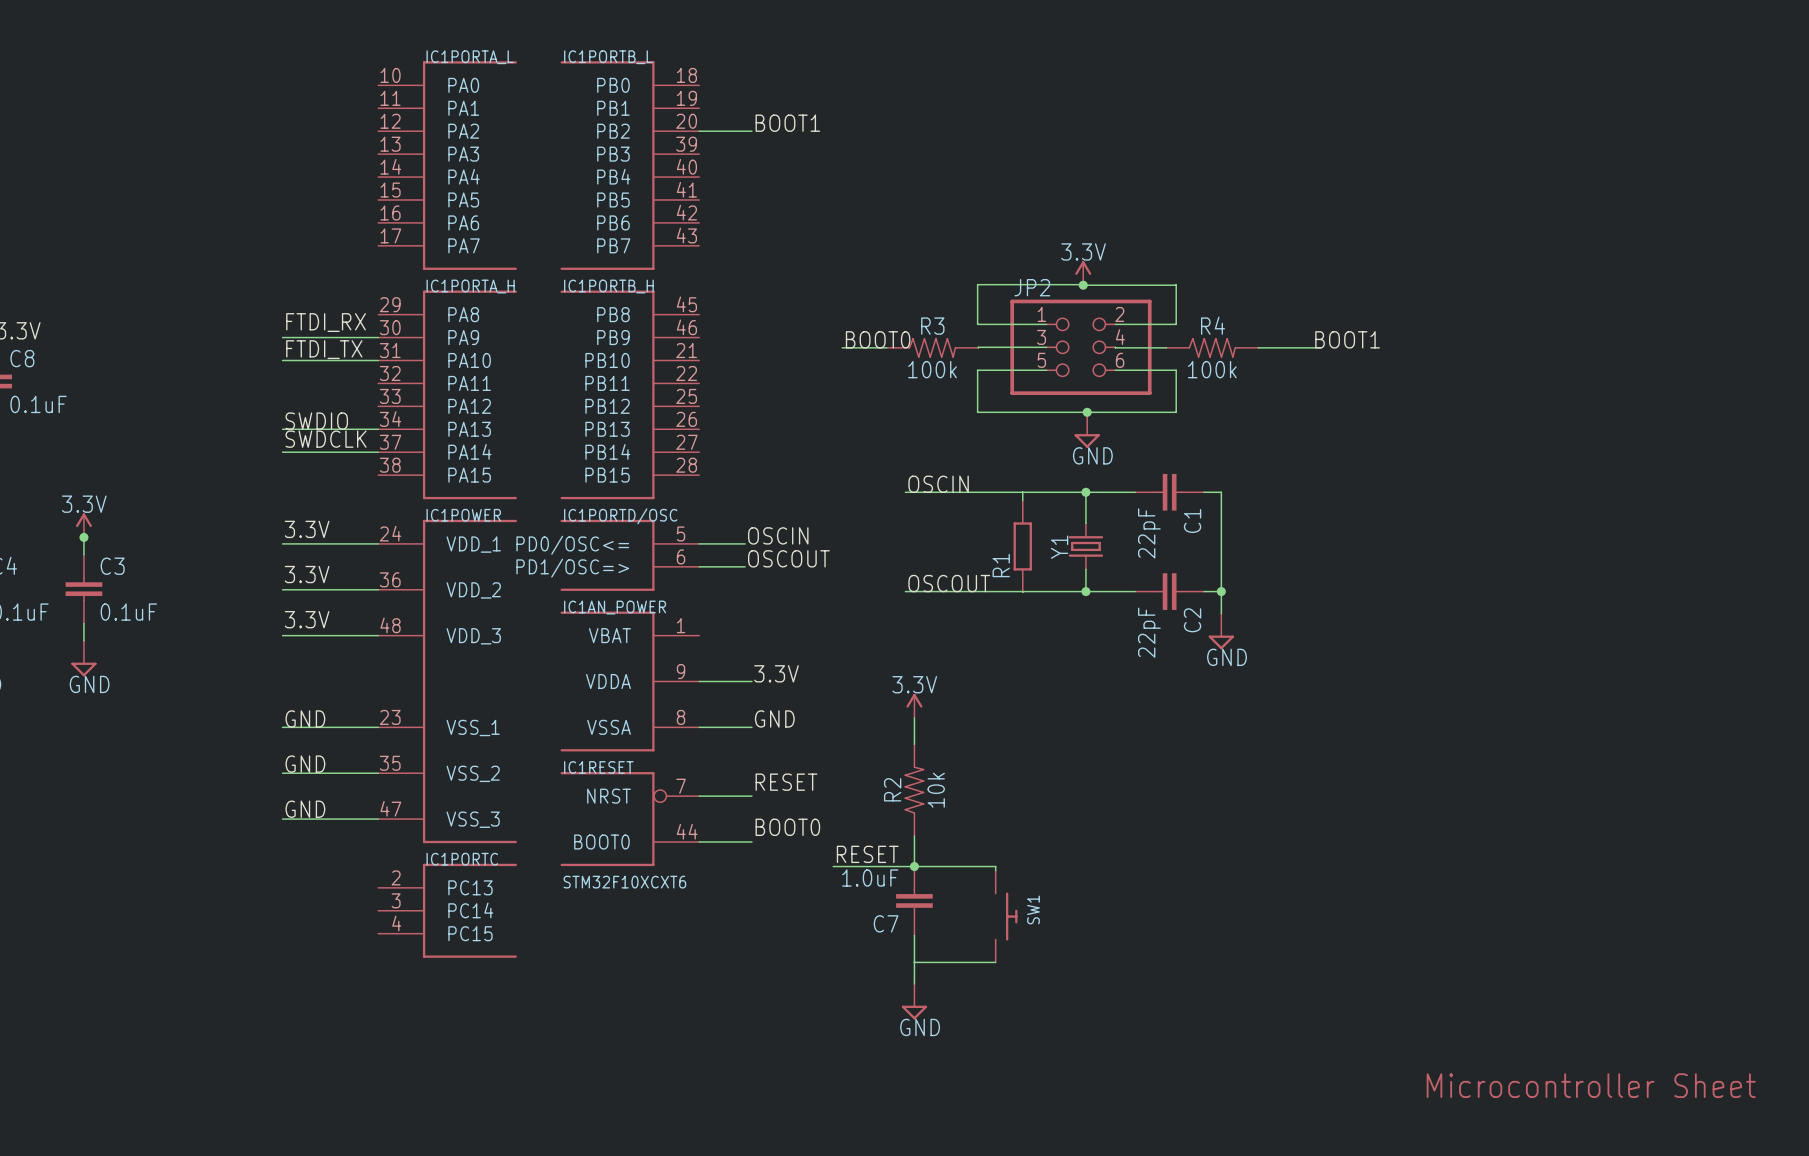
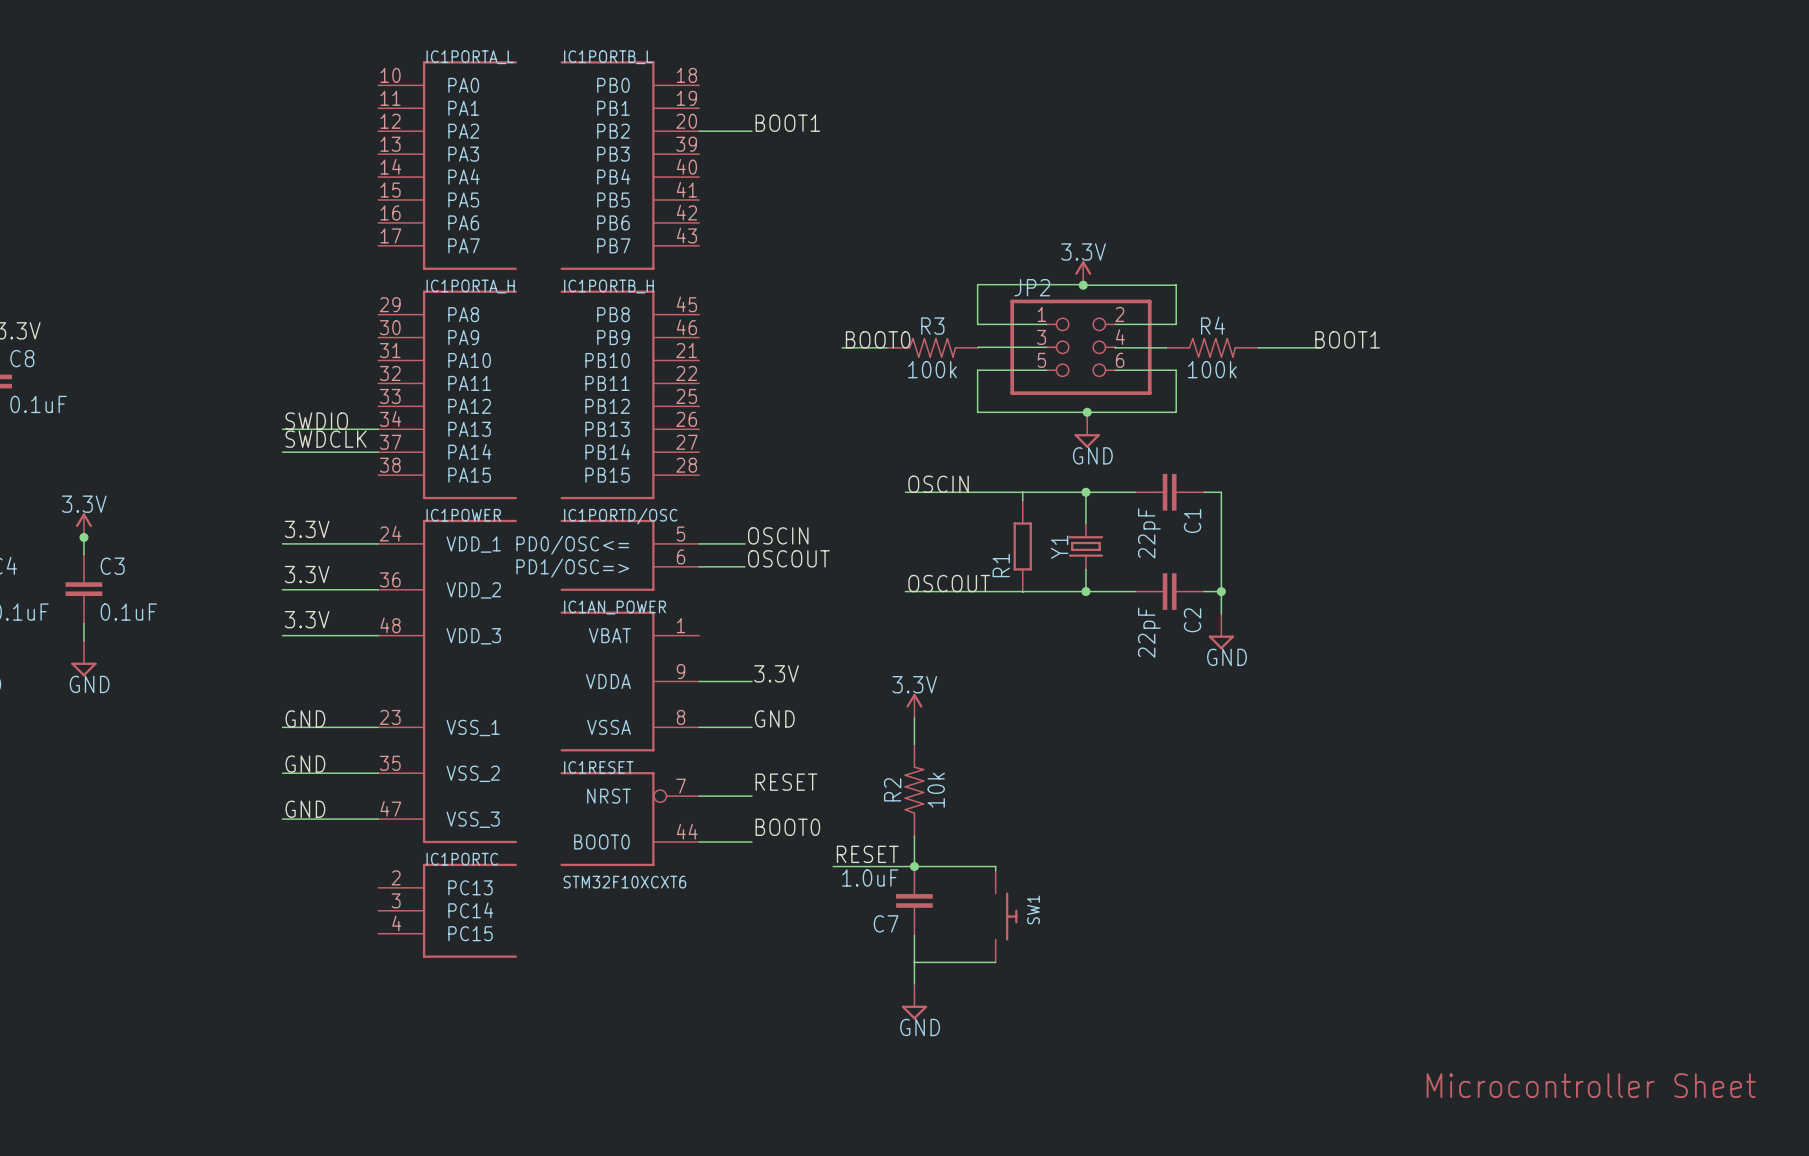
label: FTDI_RX (326, 322) -> none
wire: (282, 337) (378, 337) -> none
label: FTDI_TX (324, 349) -> none
wire: (282, 360) (378, 360) -> none

